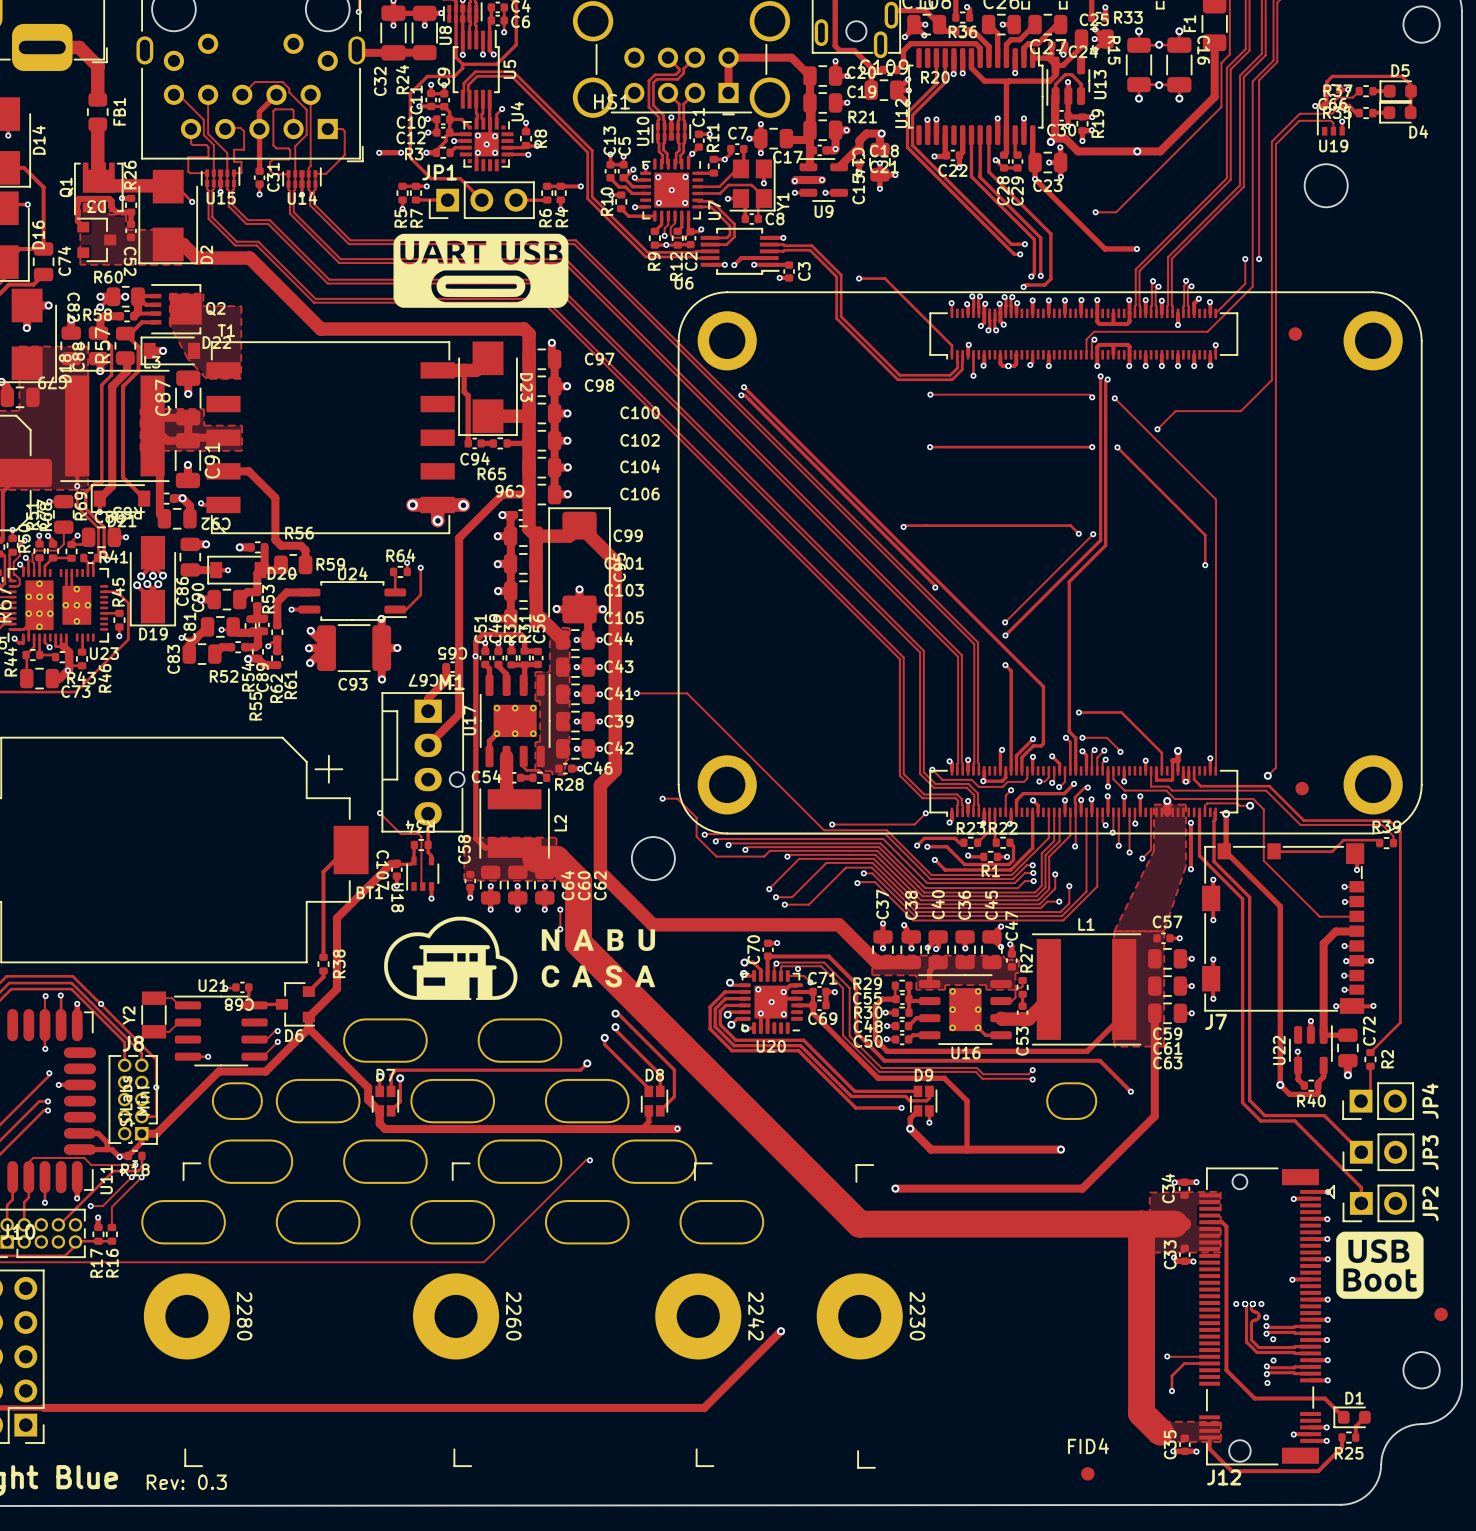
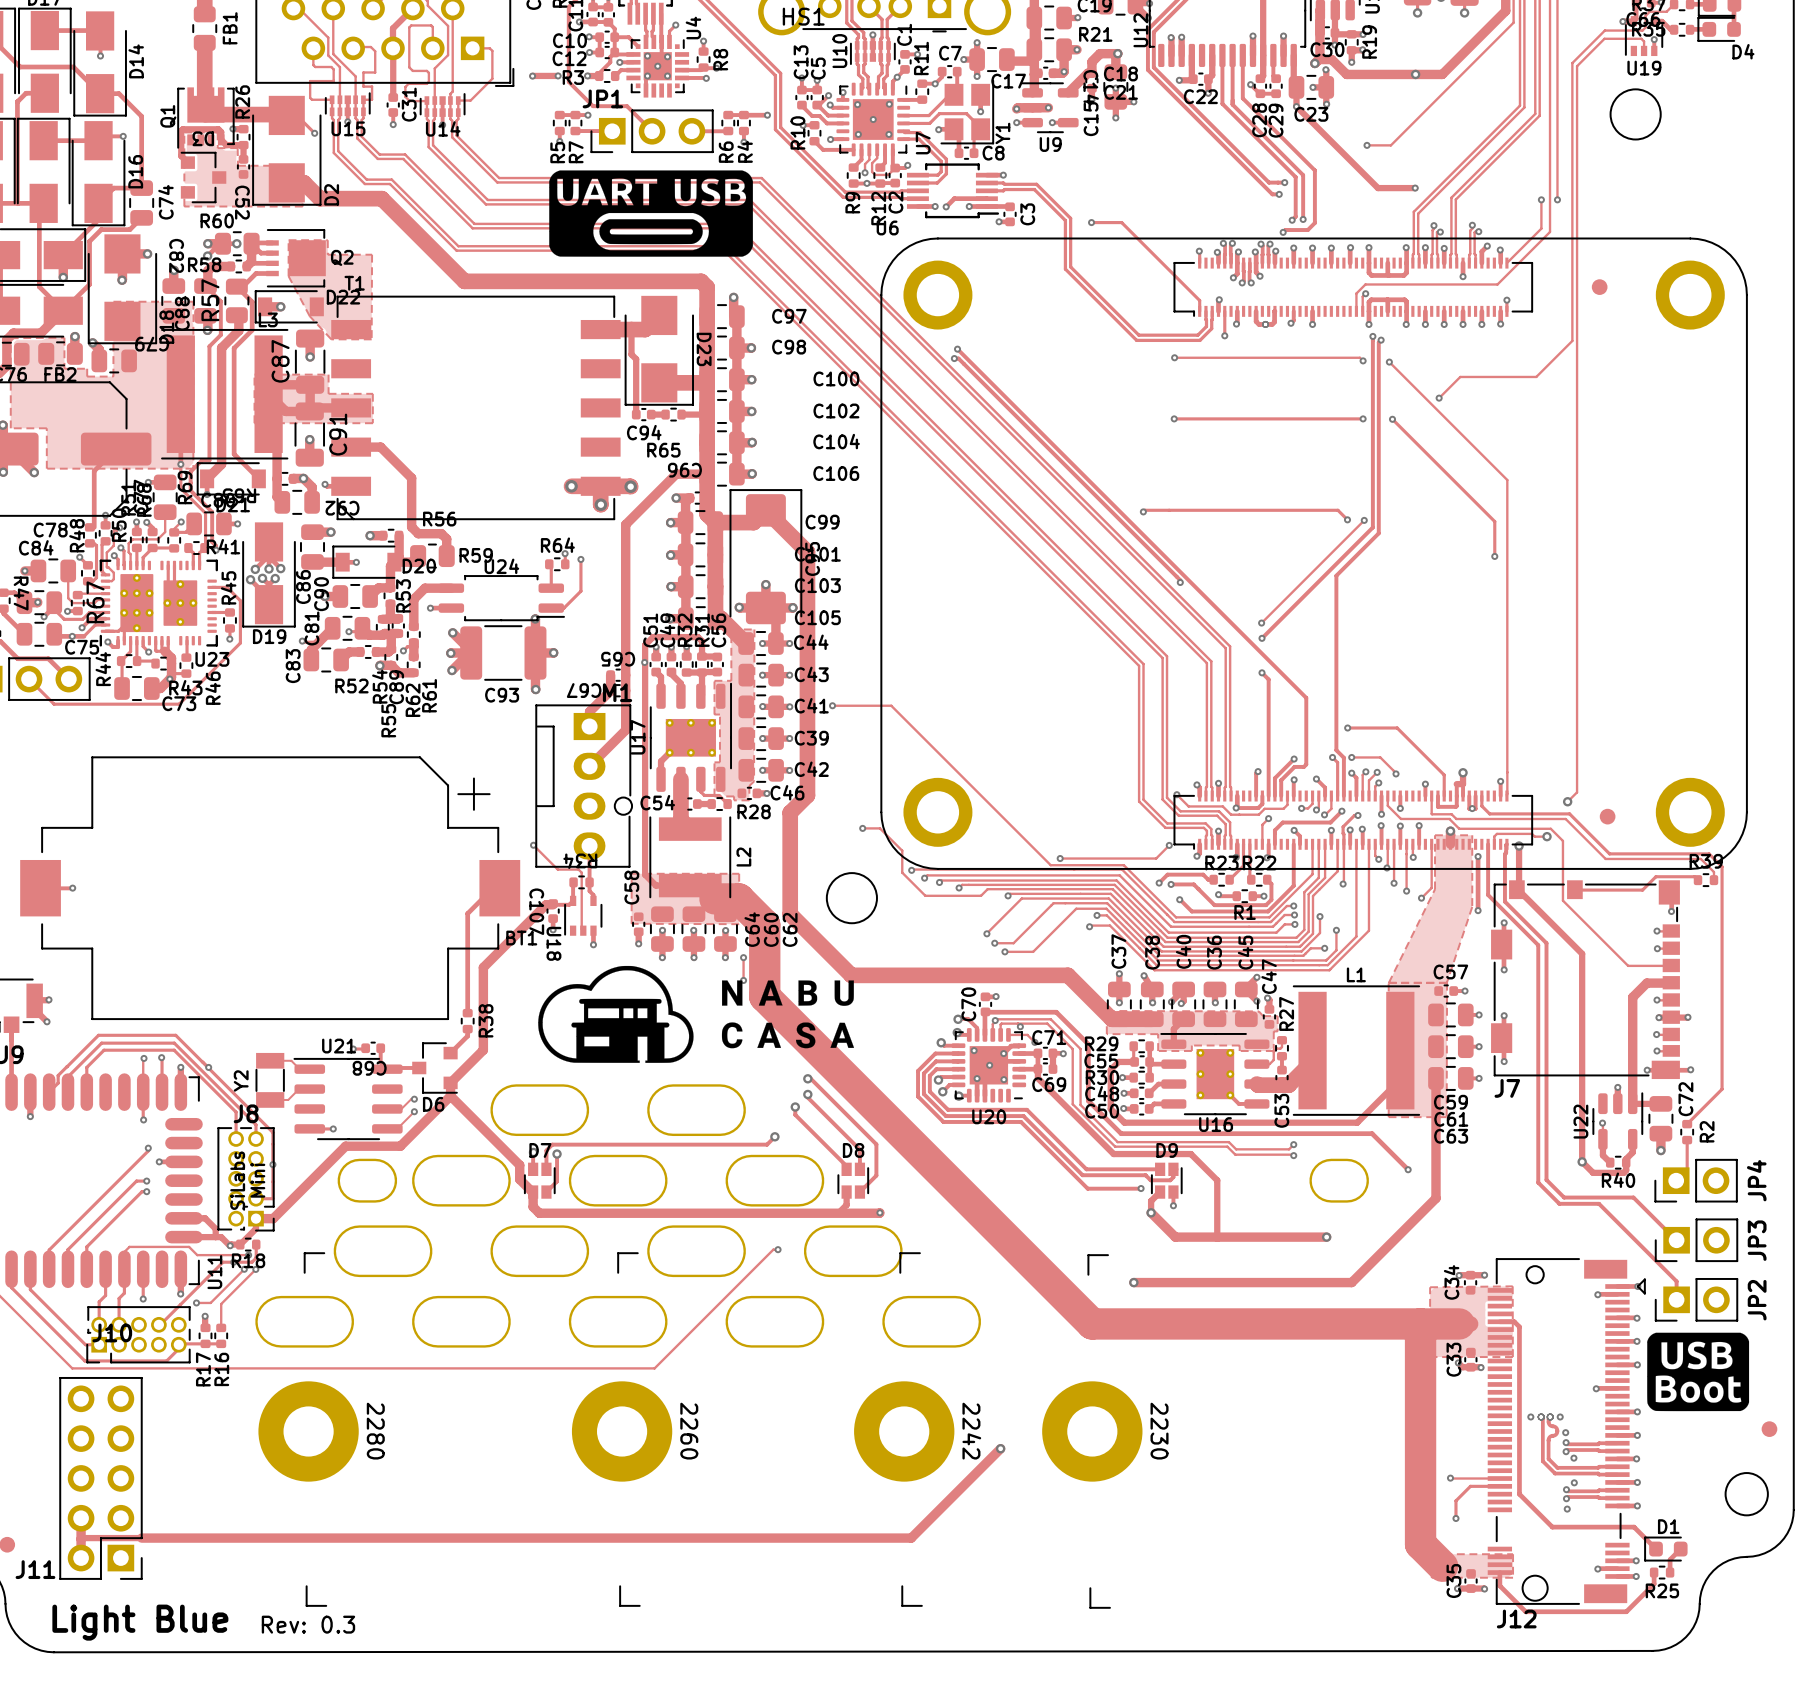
FID4: (1087, 1473) -> none

